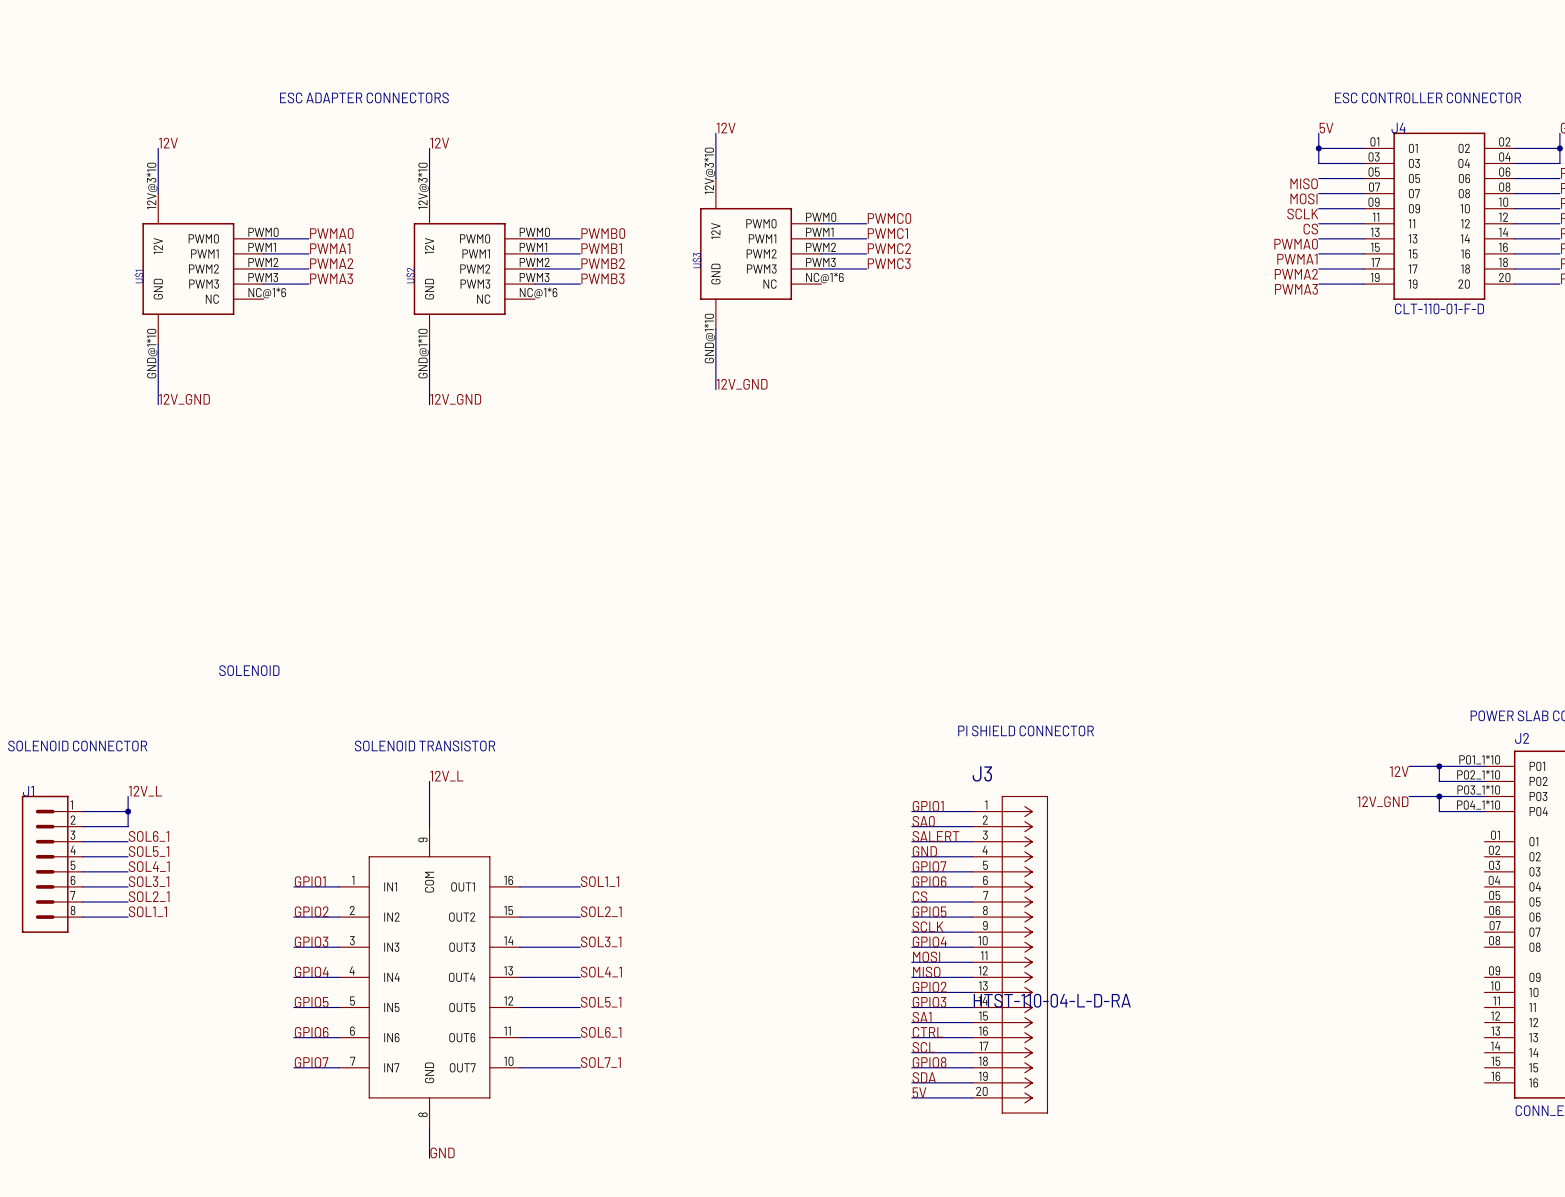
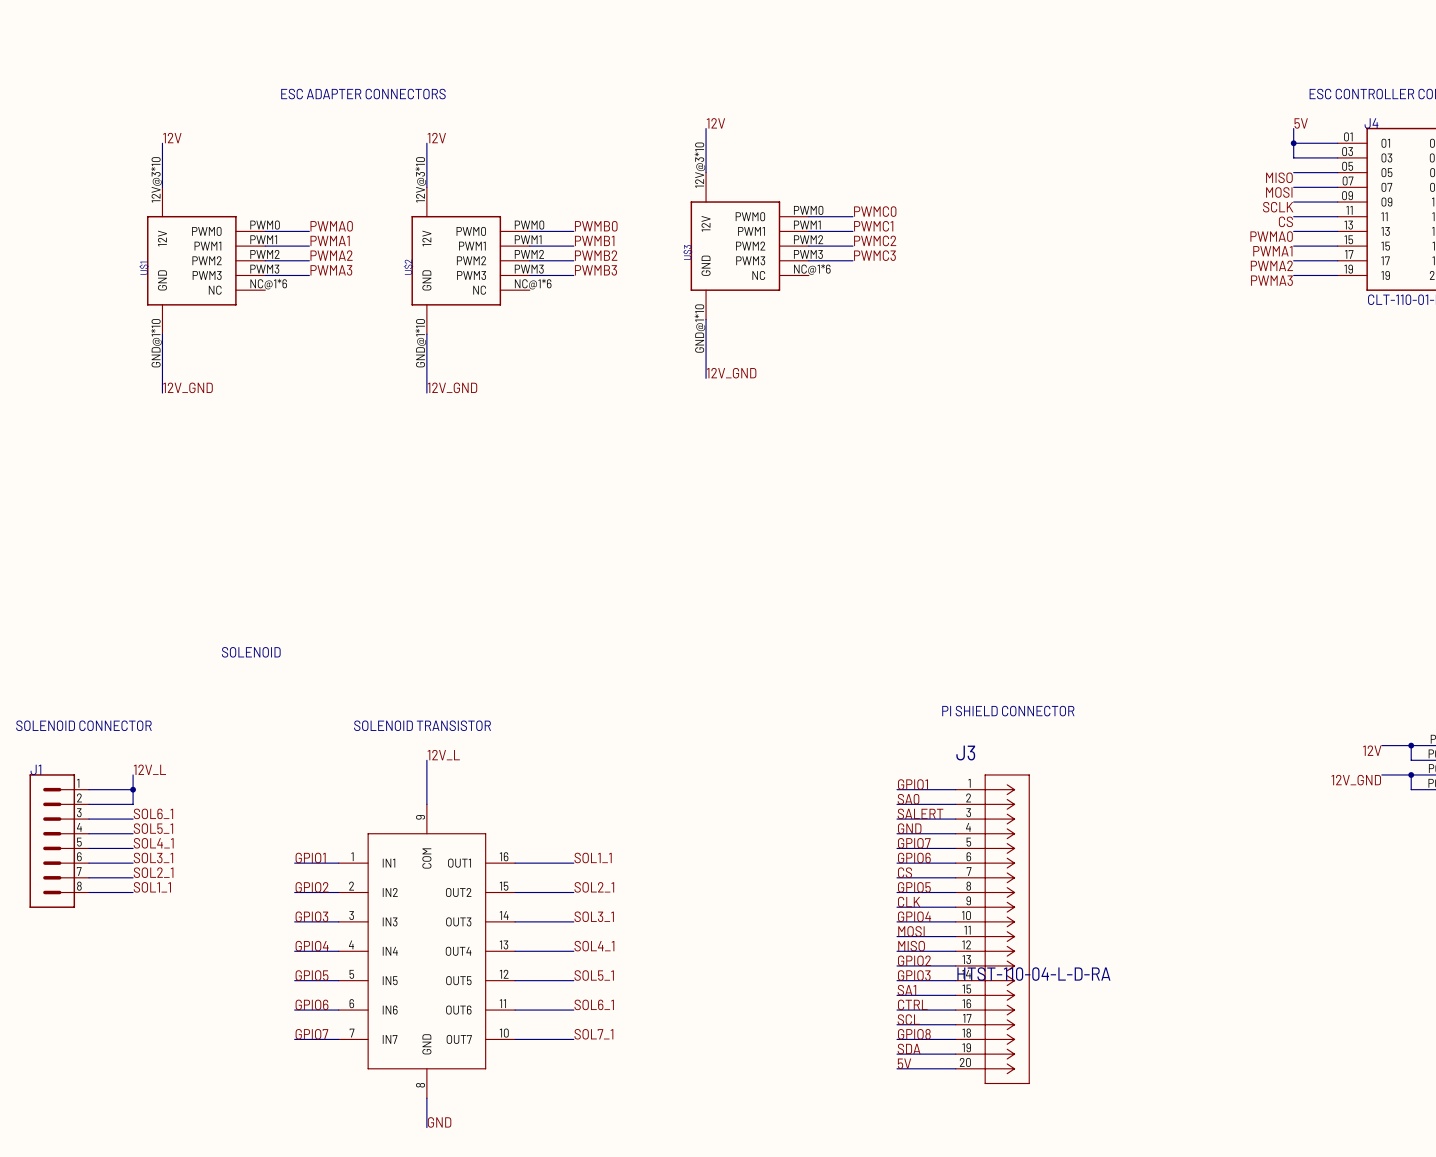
label: SCLK (928, 926) -> CLK (909, 902)

